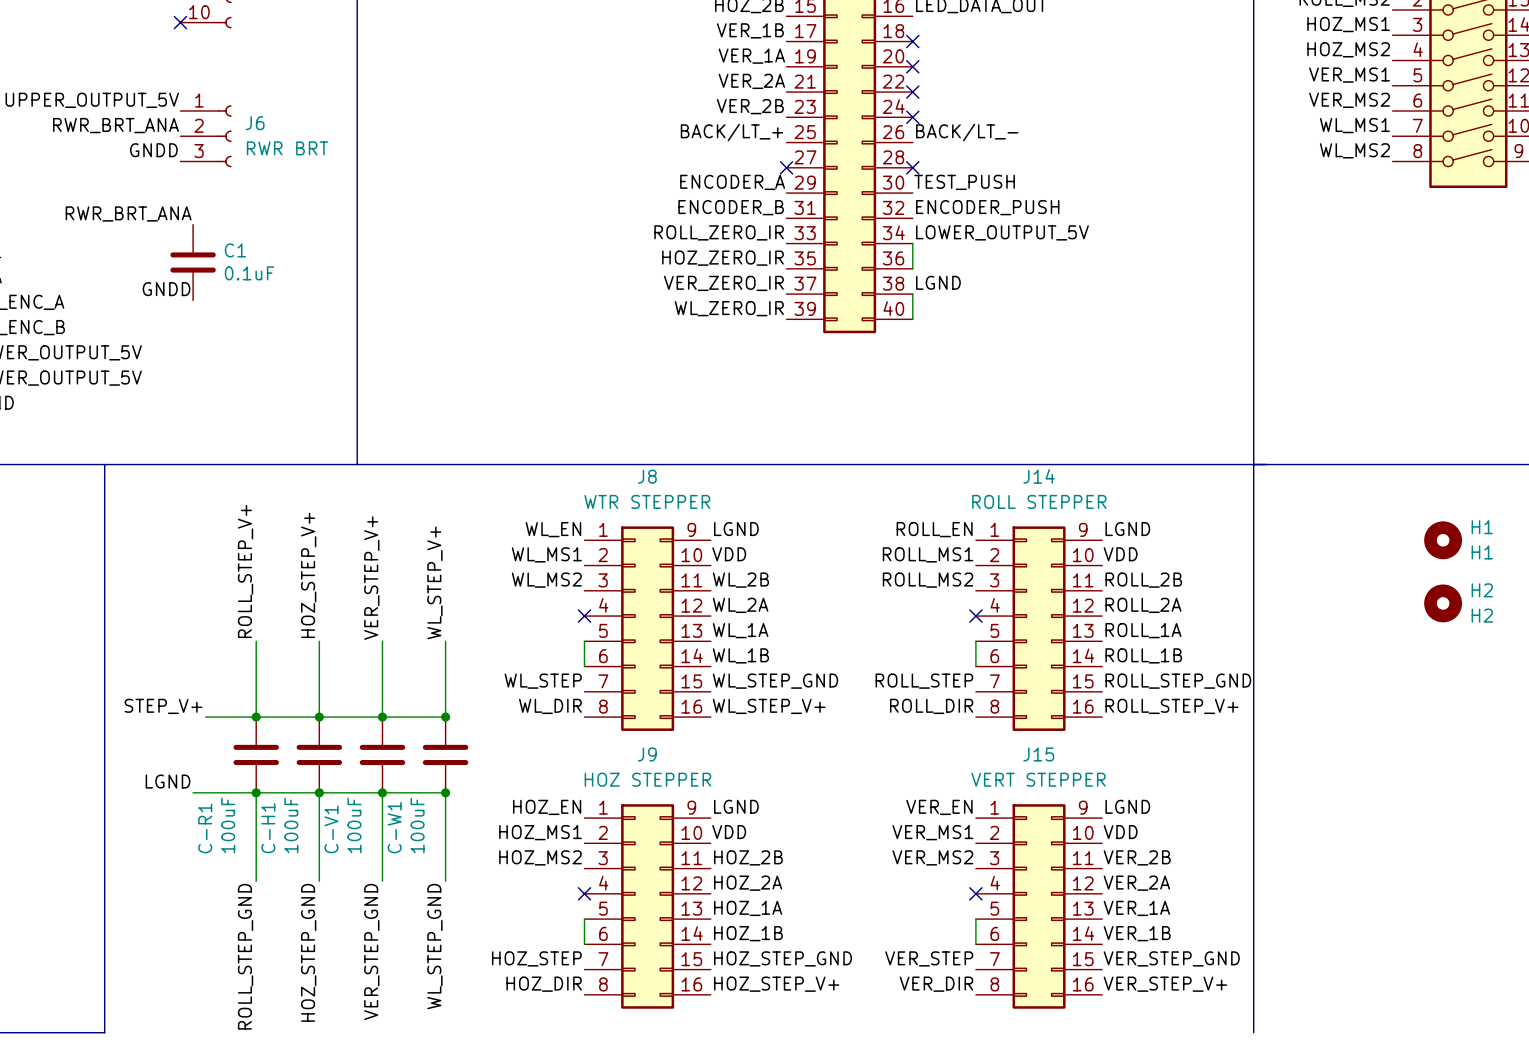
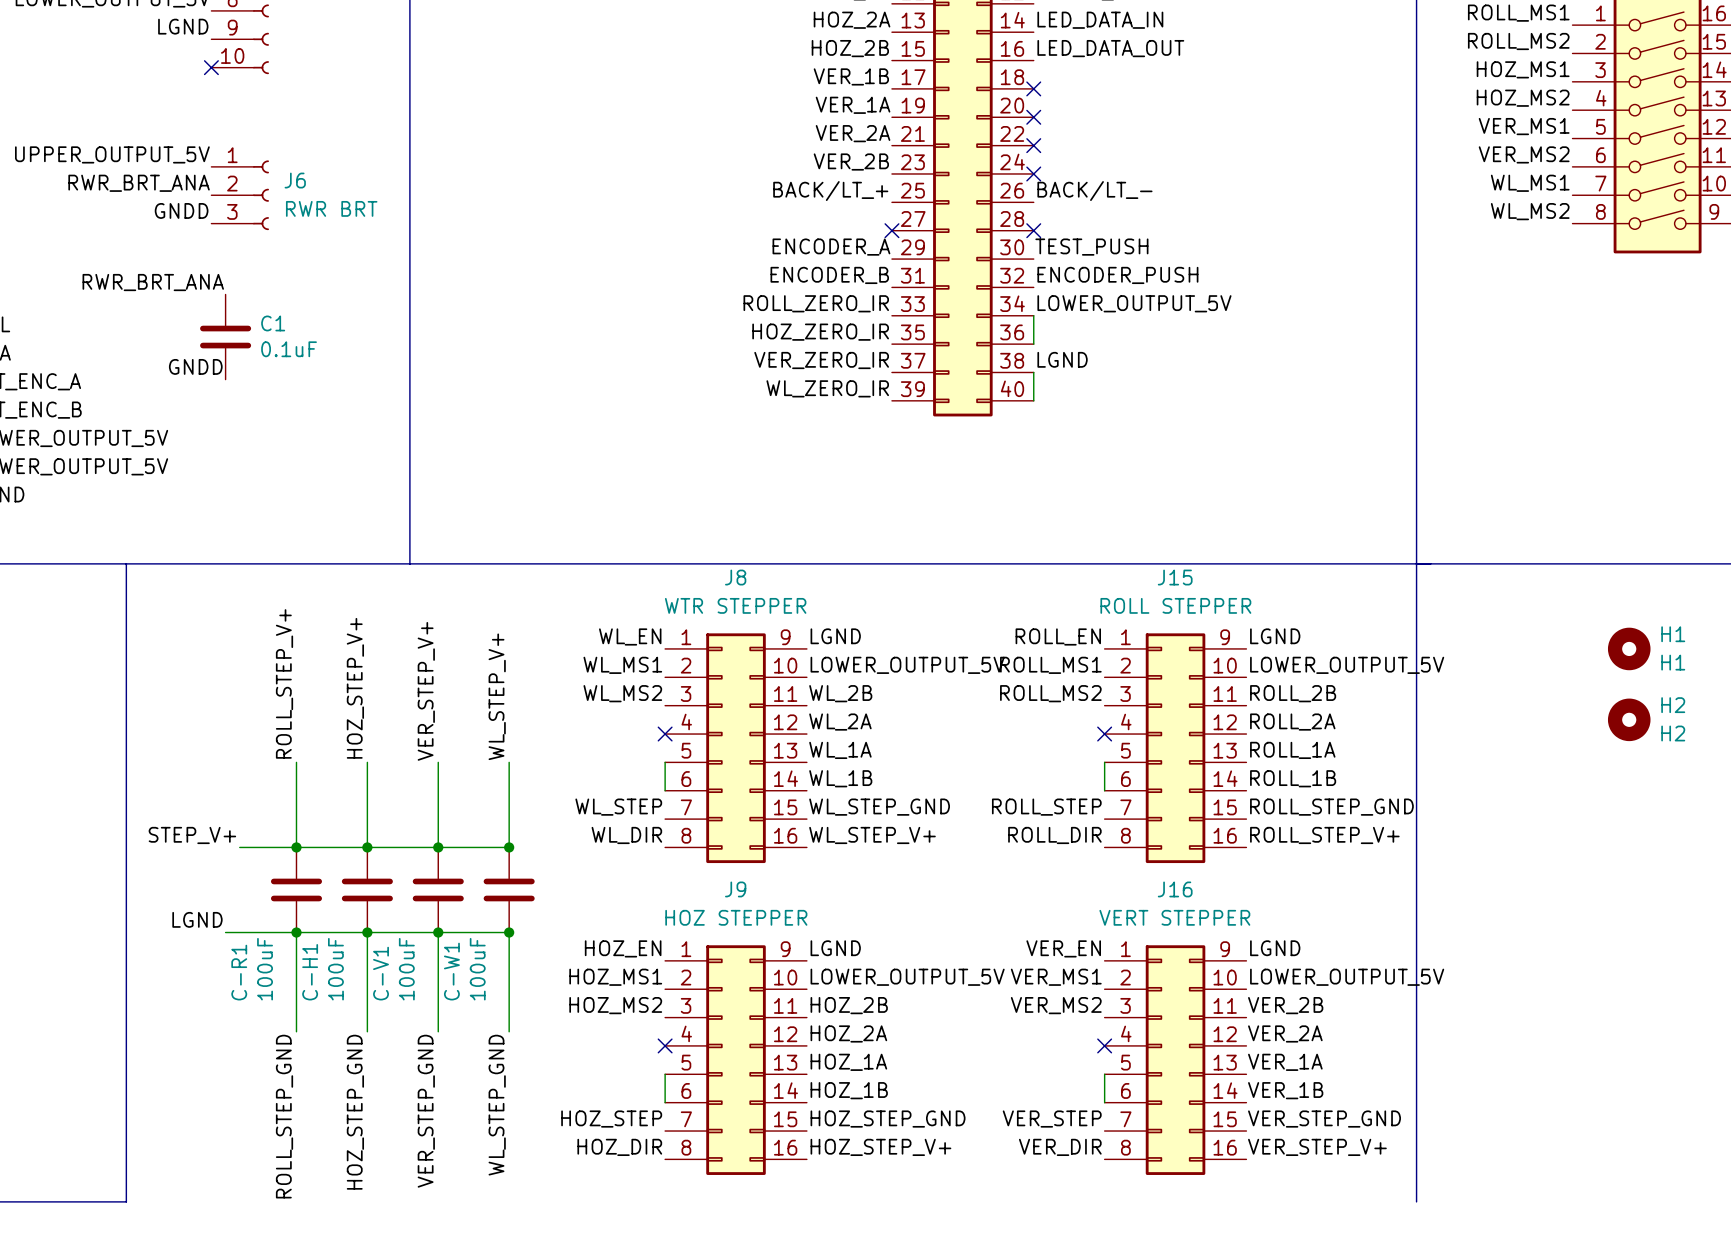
J14 name: J14 (1039, 476) -> J15 (1175, 577)
label: VDD (729, 554) -> LOWER_OUTPUT_5V (907, 665)
label: VDD (1120, 554) -> LOWER_OUTPUT_5V (1347, 665)
J15 name: J15 (1038, 754) -> J16 (1175, 889)
label: VDD (729, 832) -> LOWER_OUTPUT_5V (907, 977)
label: VDD (1120, 832) -> LOWER_OUTPUT_5V (1347, 977)

